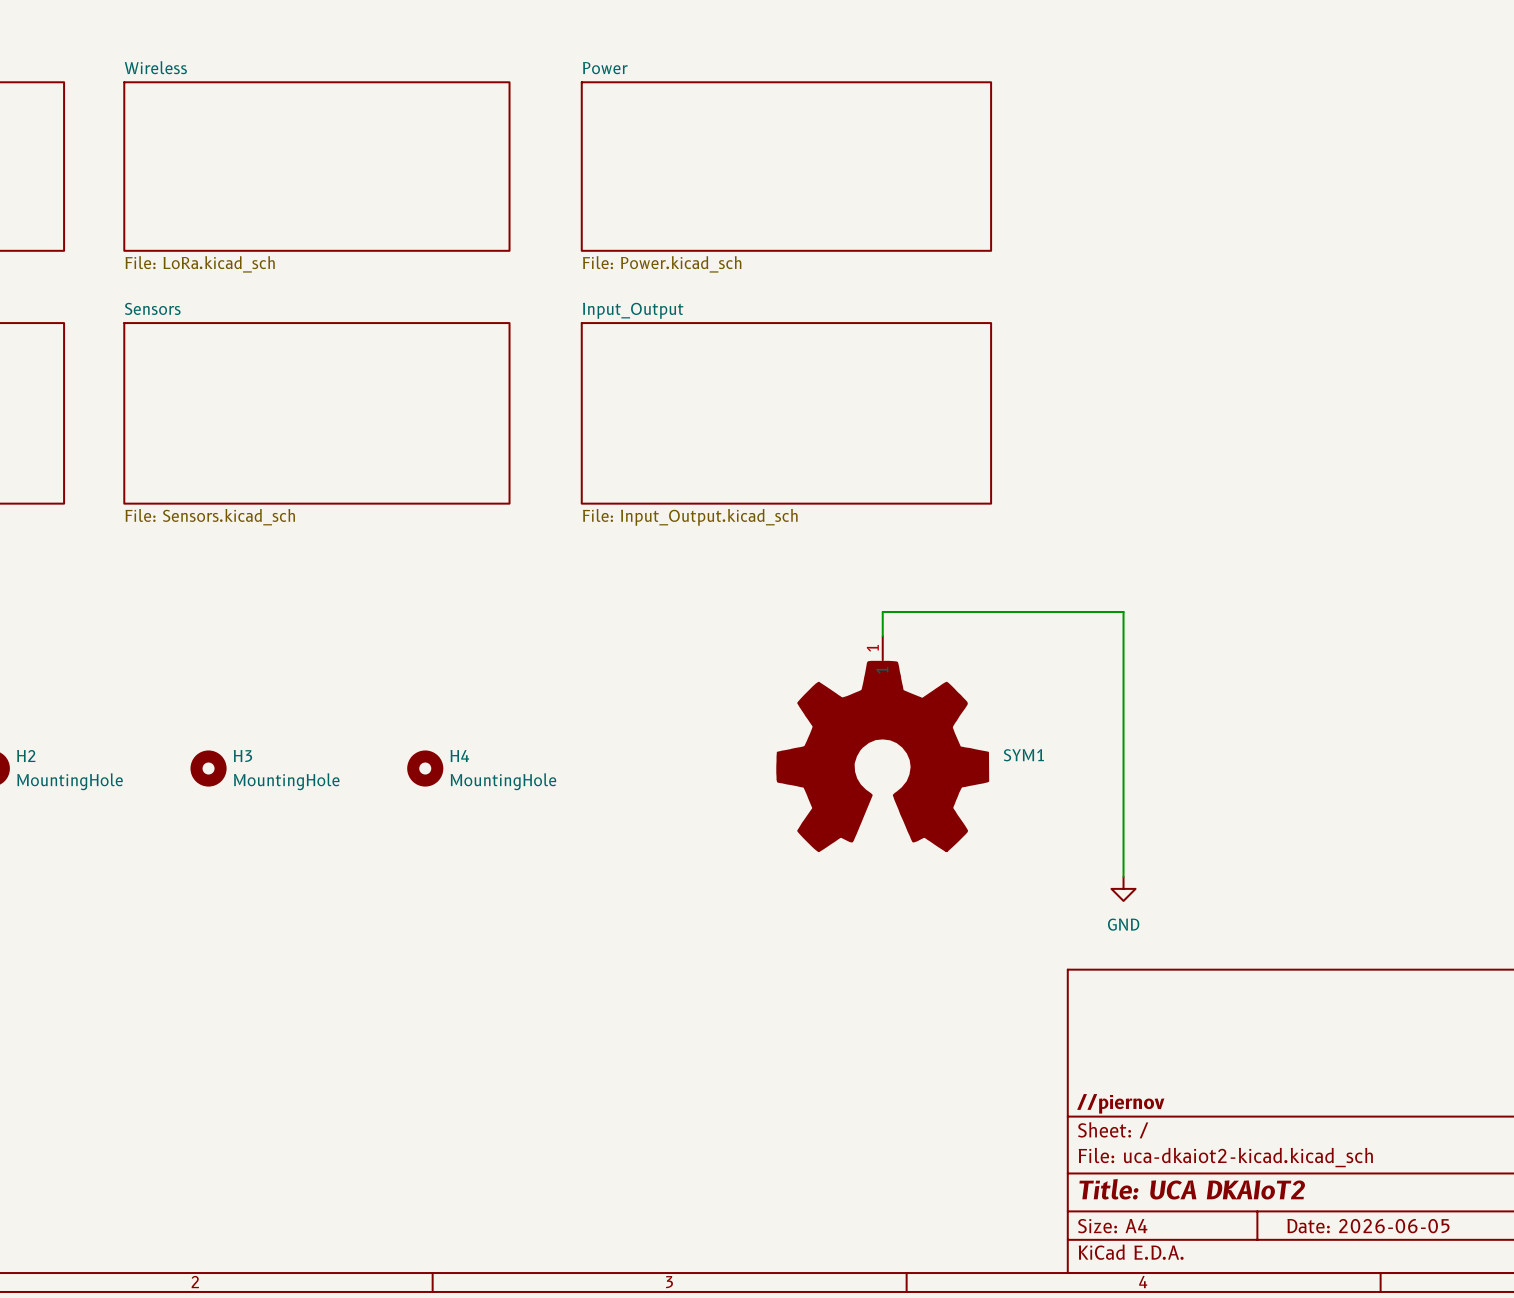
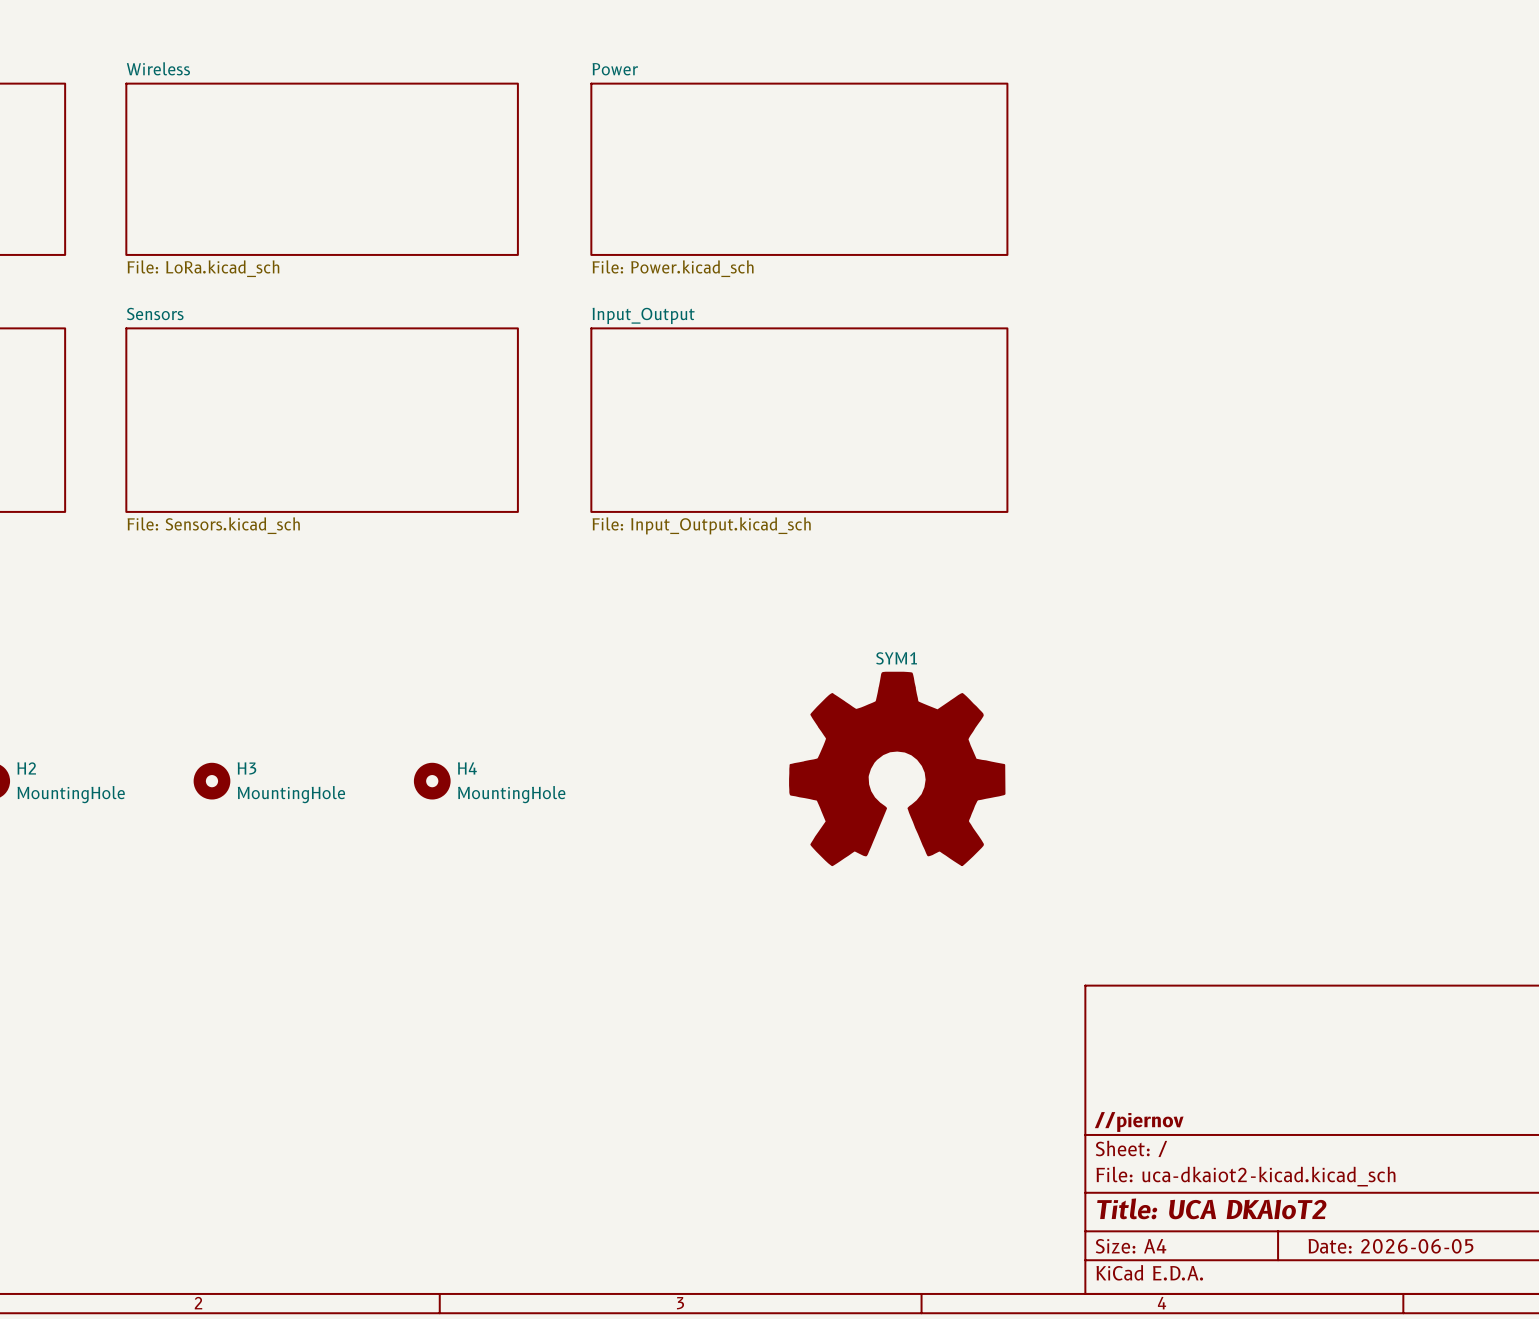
SYM1 symbol: [777, 636, 989, 852] -> [790, 672, 1005, 866]
wire: (882, 636) (882, 612) (1123, 612) (1123, 876) -> none
SYM1 name position: SYM1 (1023, 755) -> SYM1 (896, 658)
power symbol: GND (1123, 888) -> none

